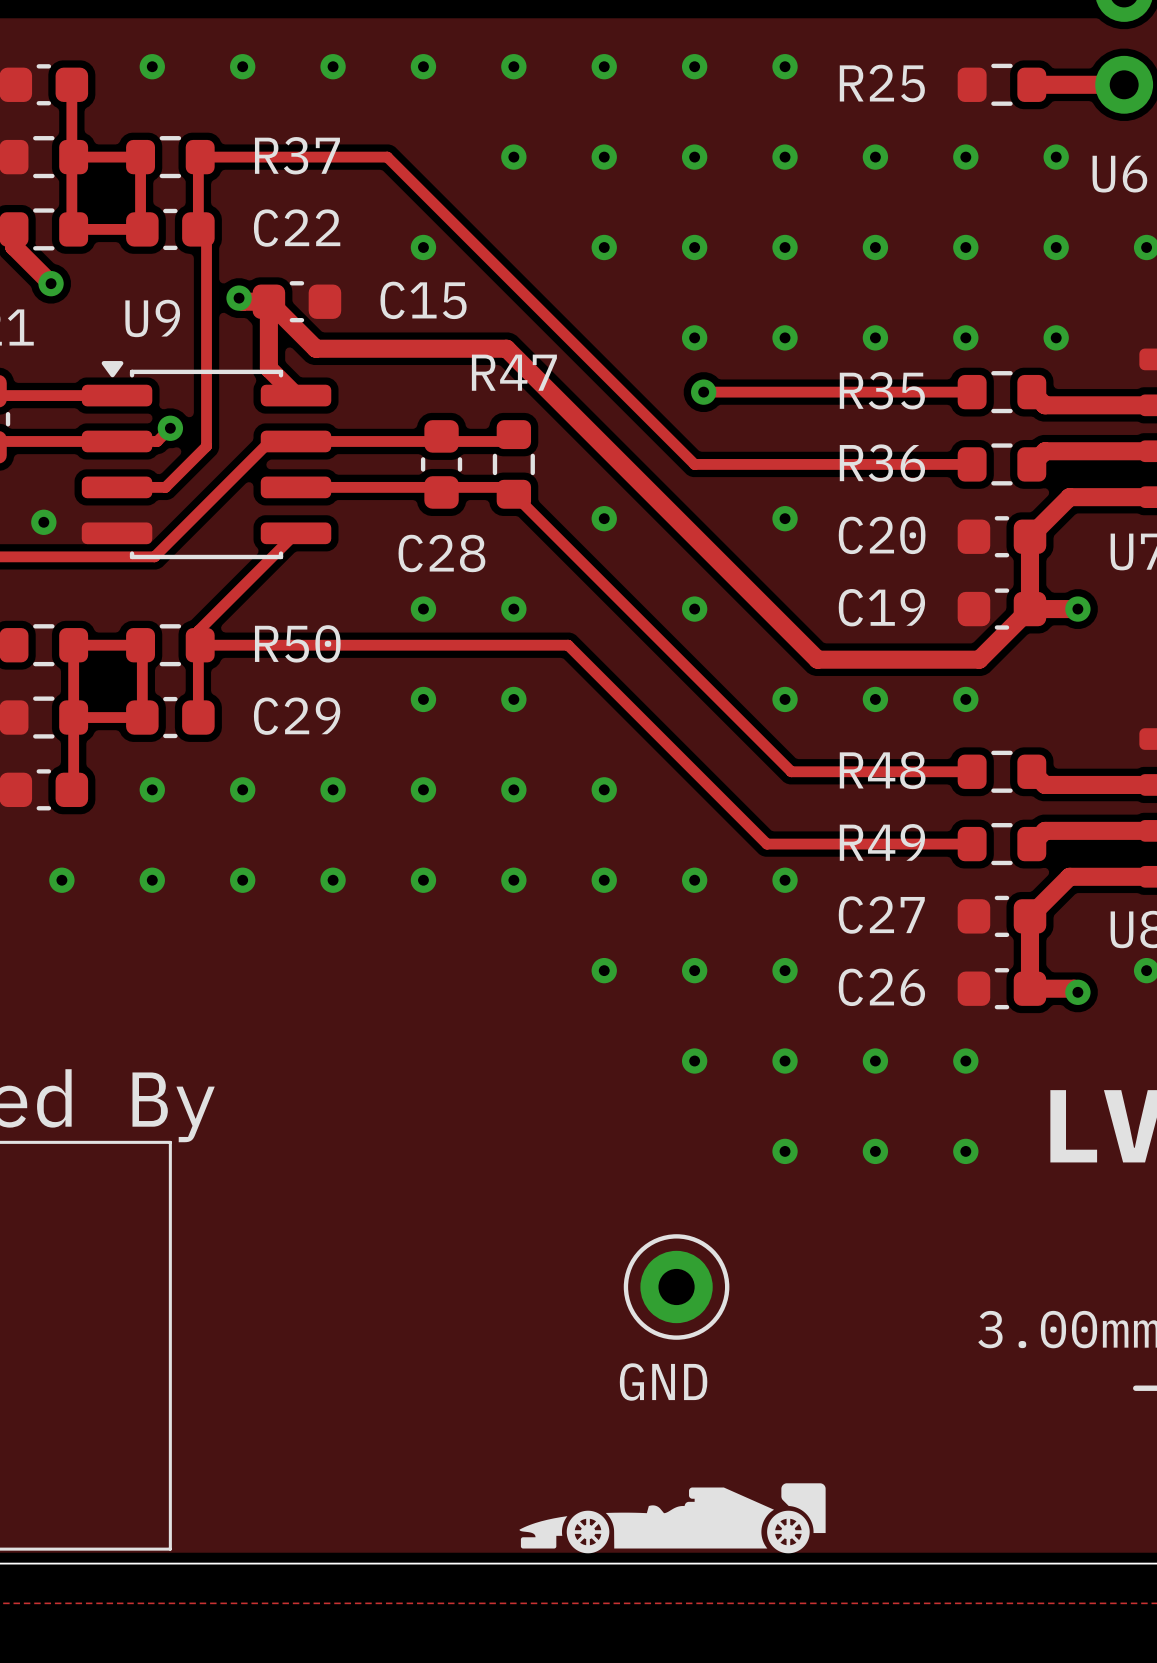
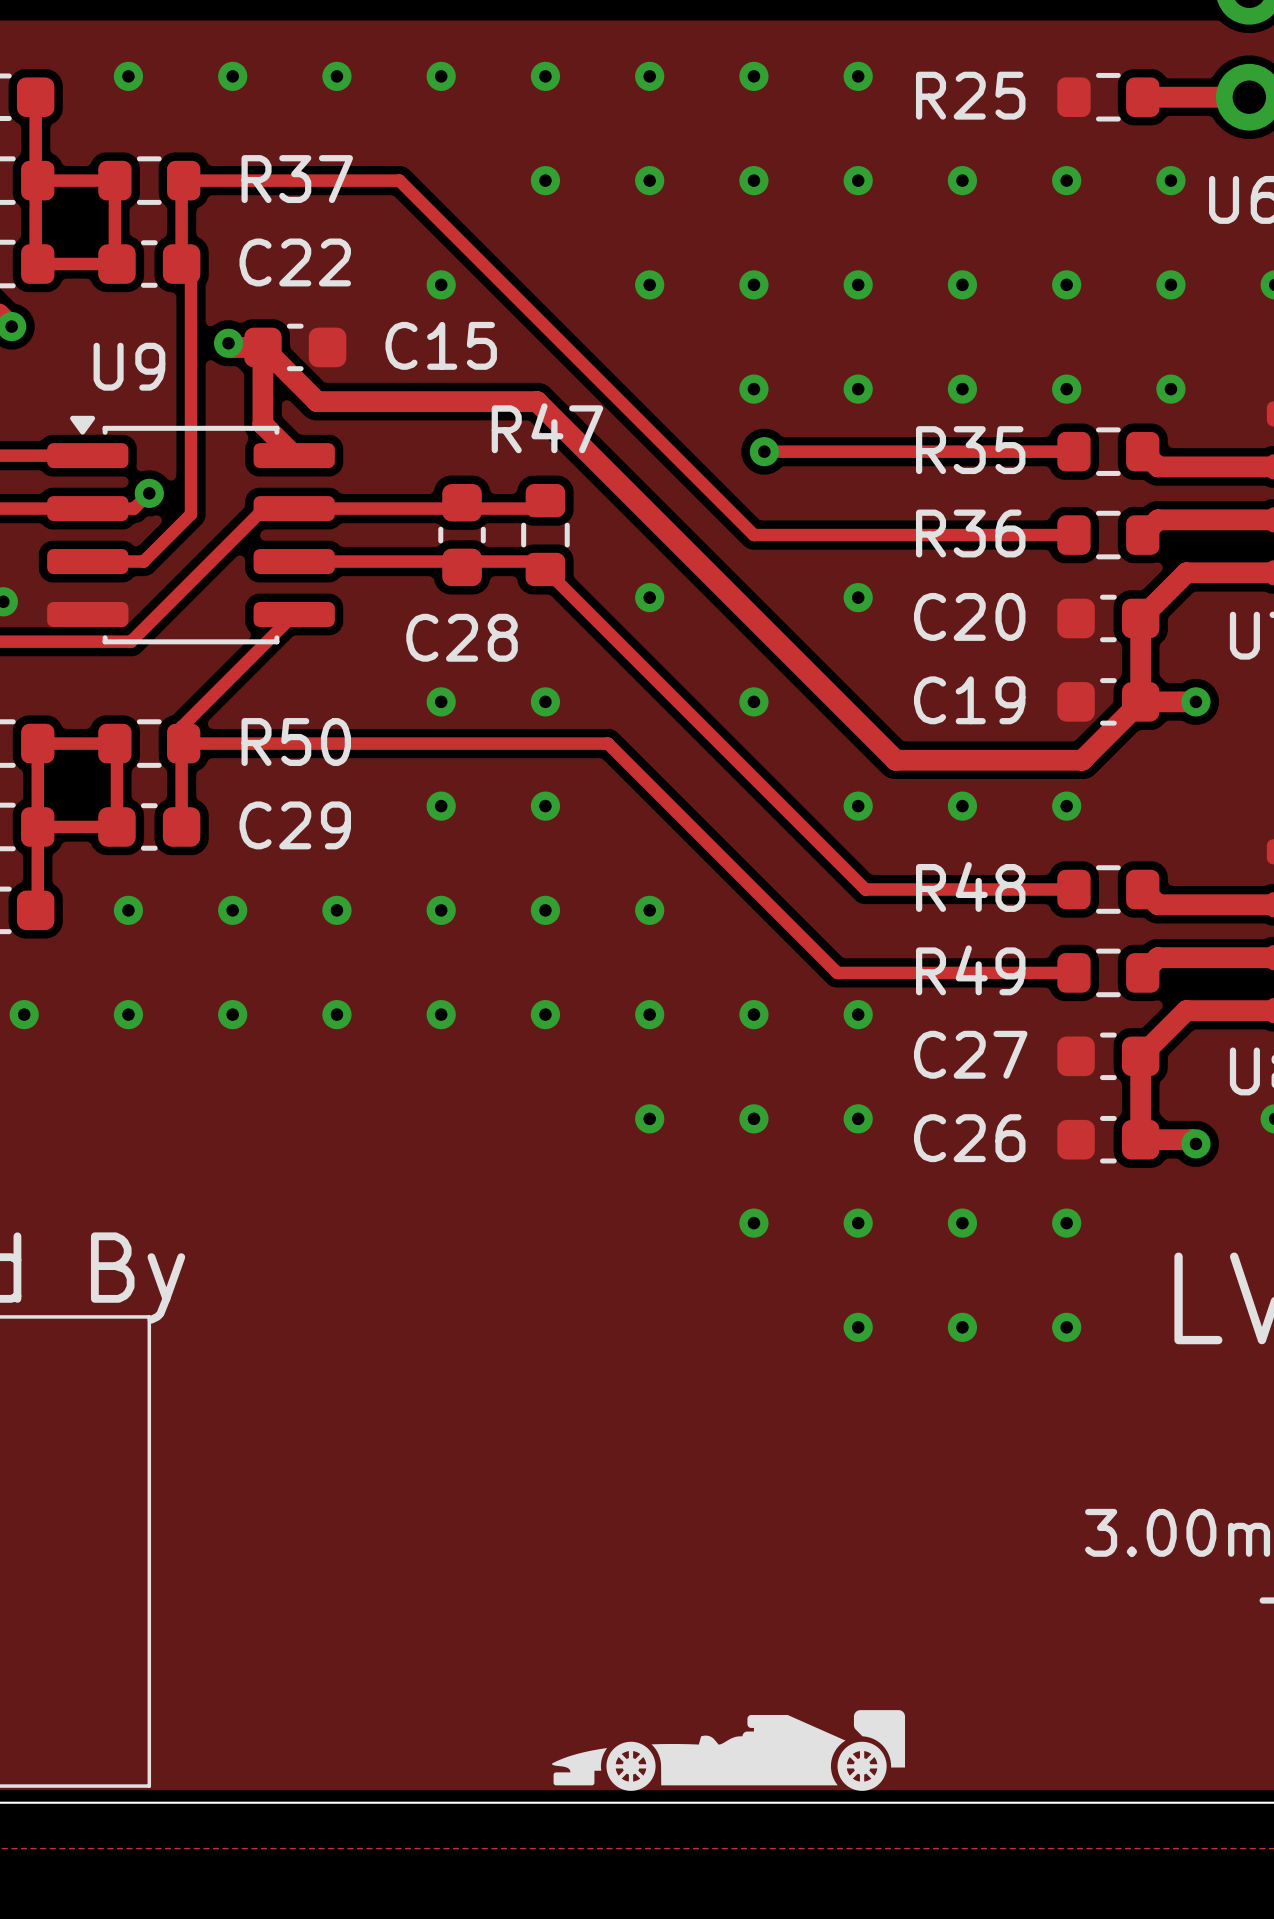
part: (676, 1286) -> none
text: GND (663, 1382) -> none

